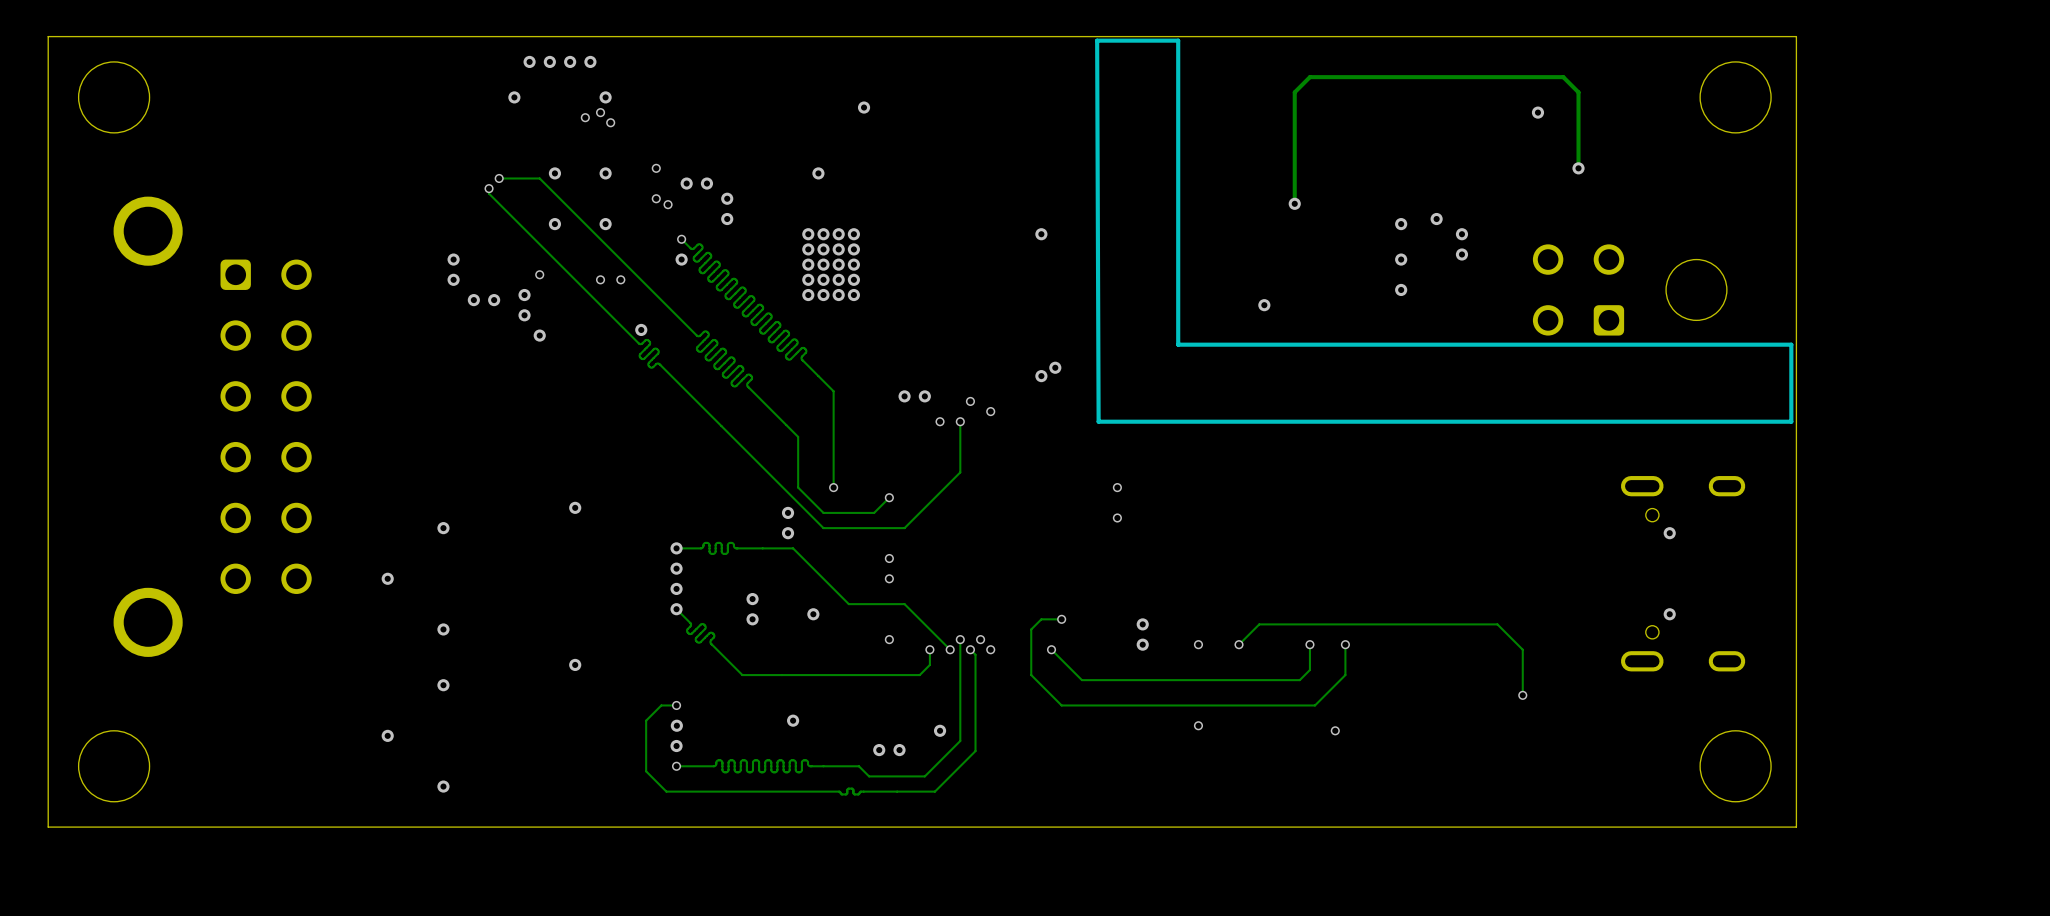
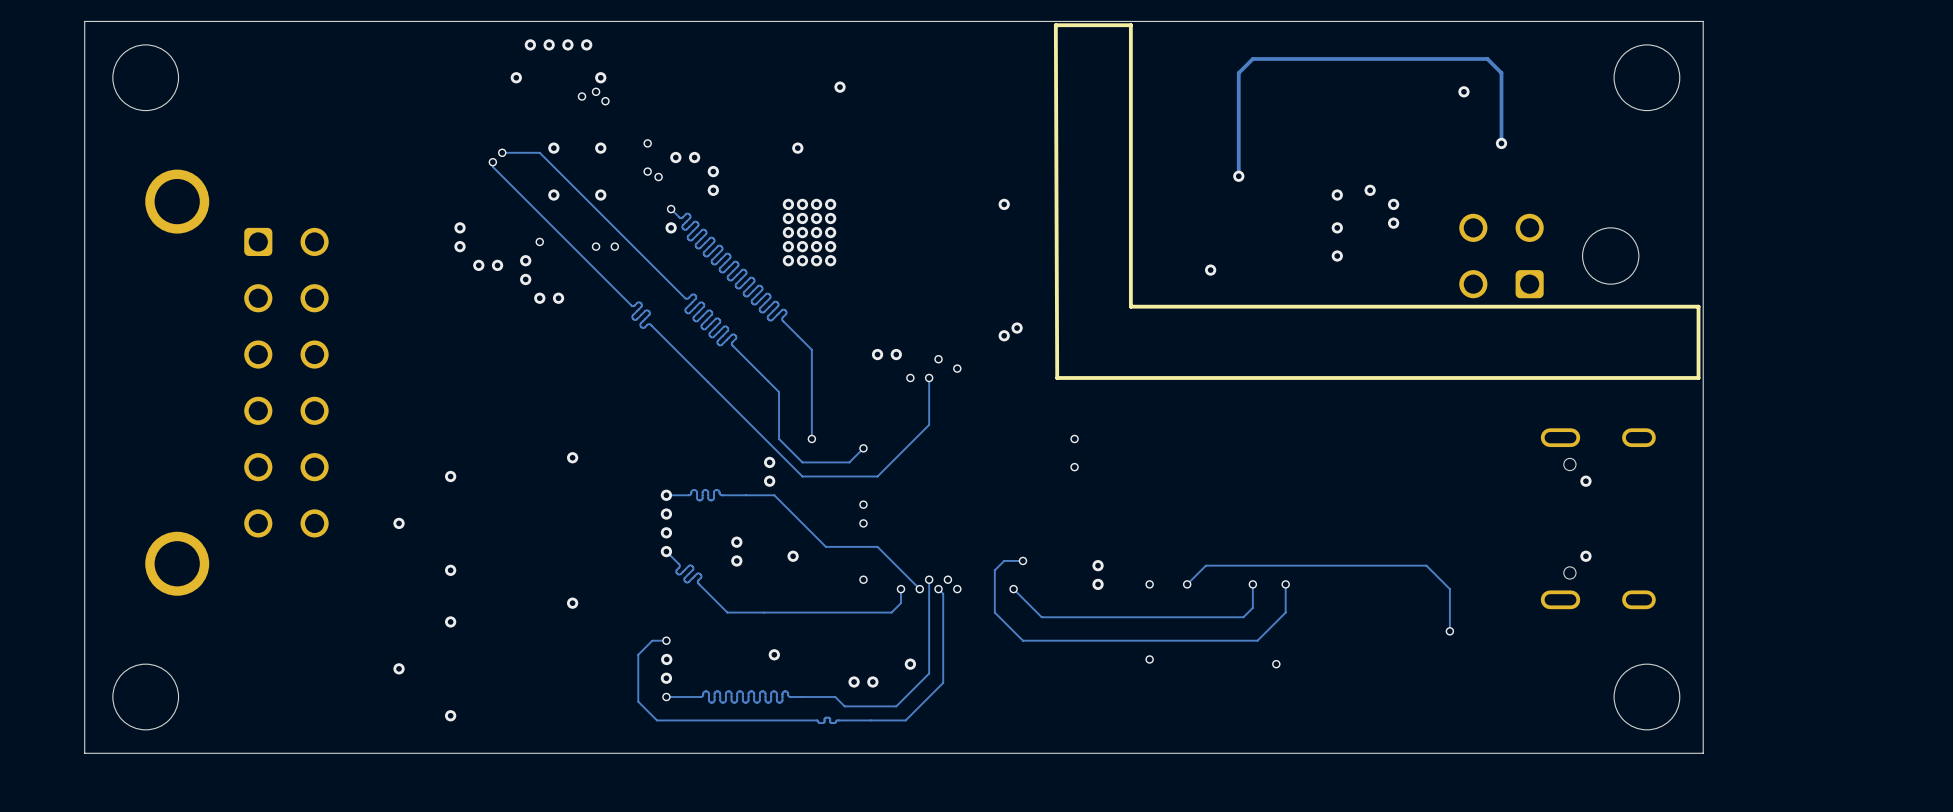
via position: (641, 329) -> (558, 298)

